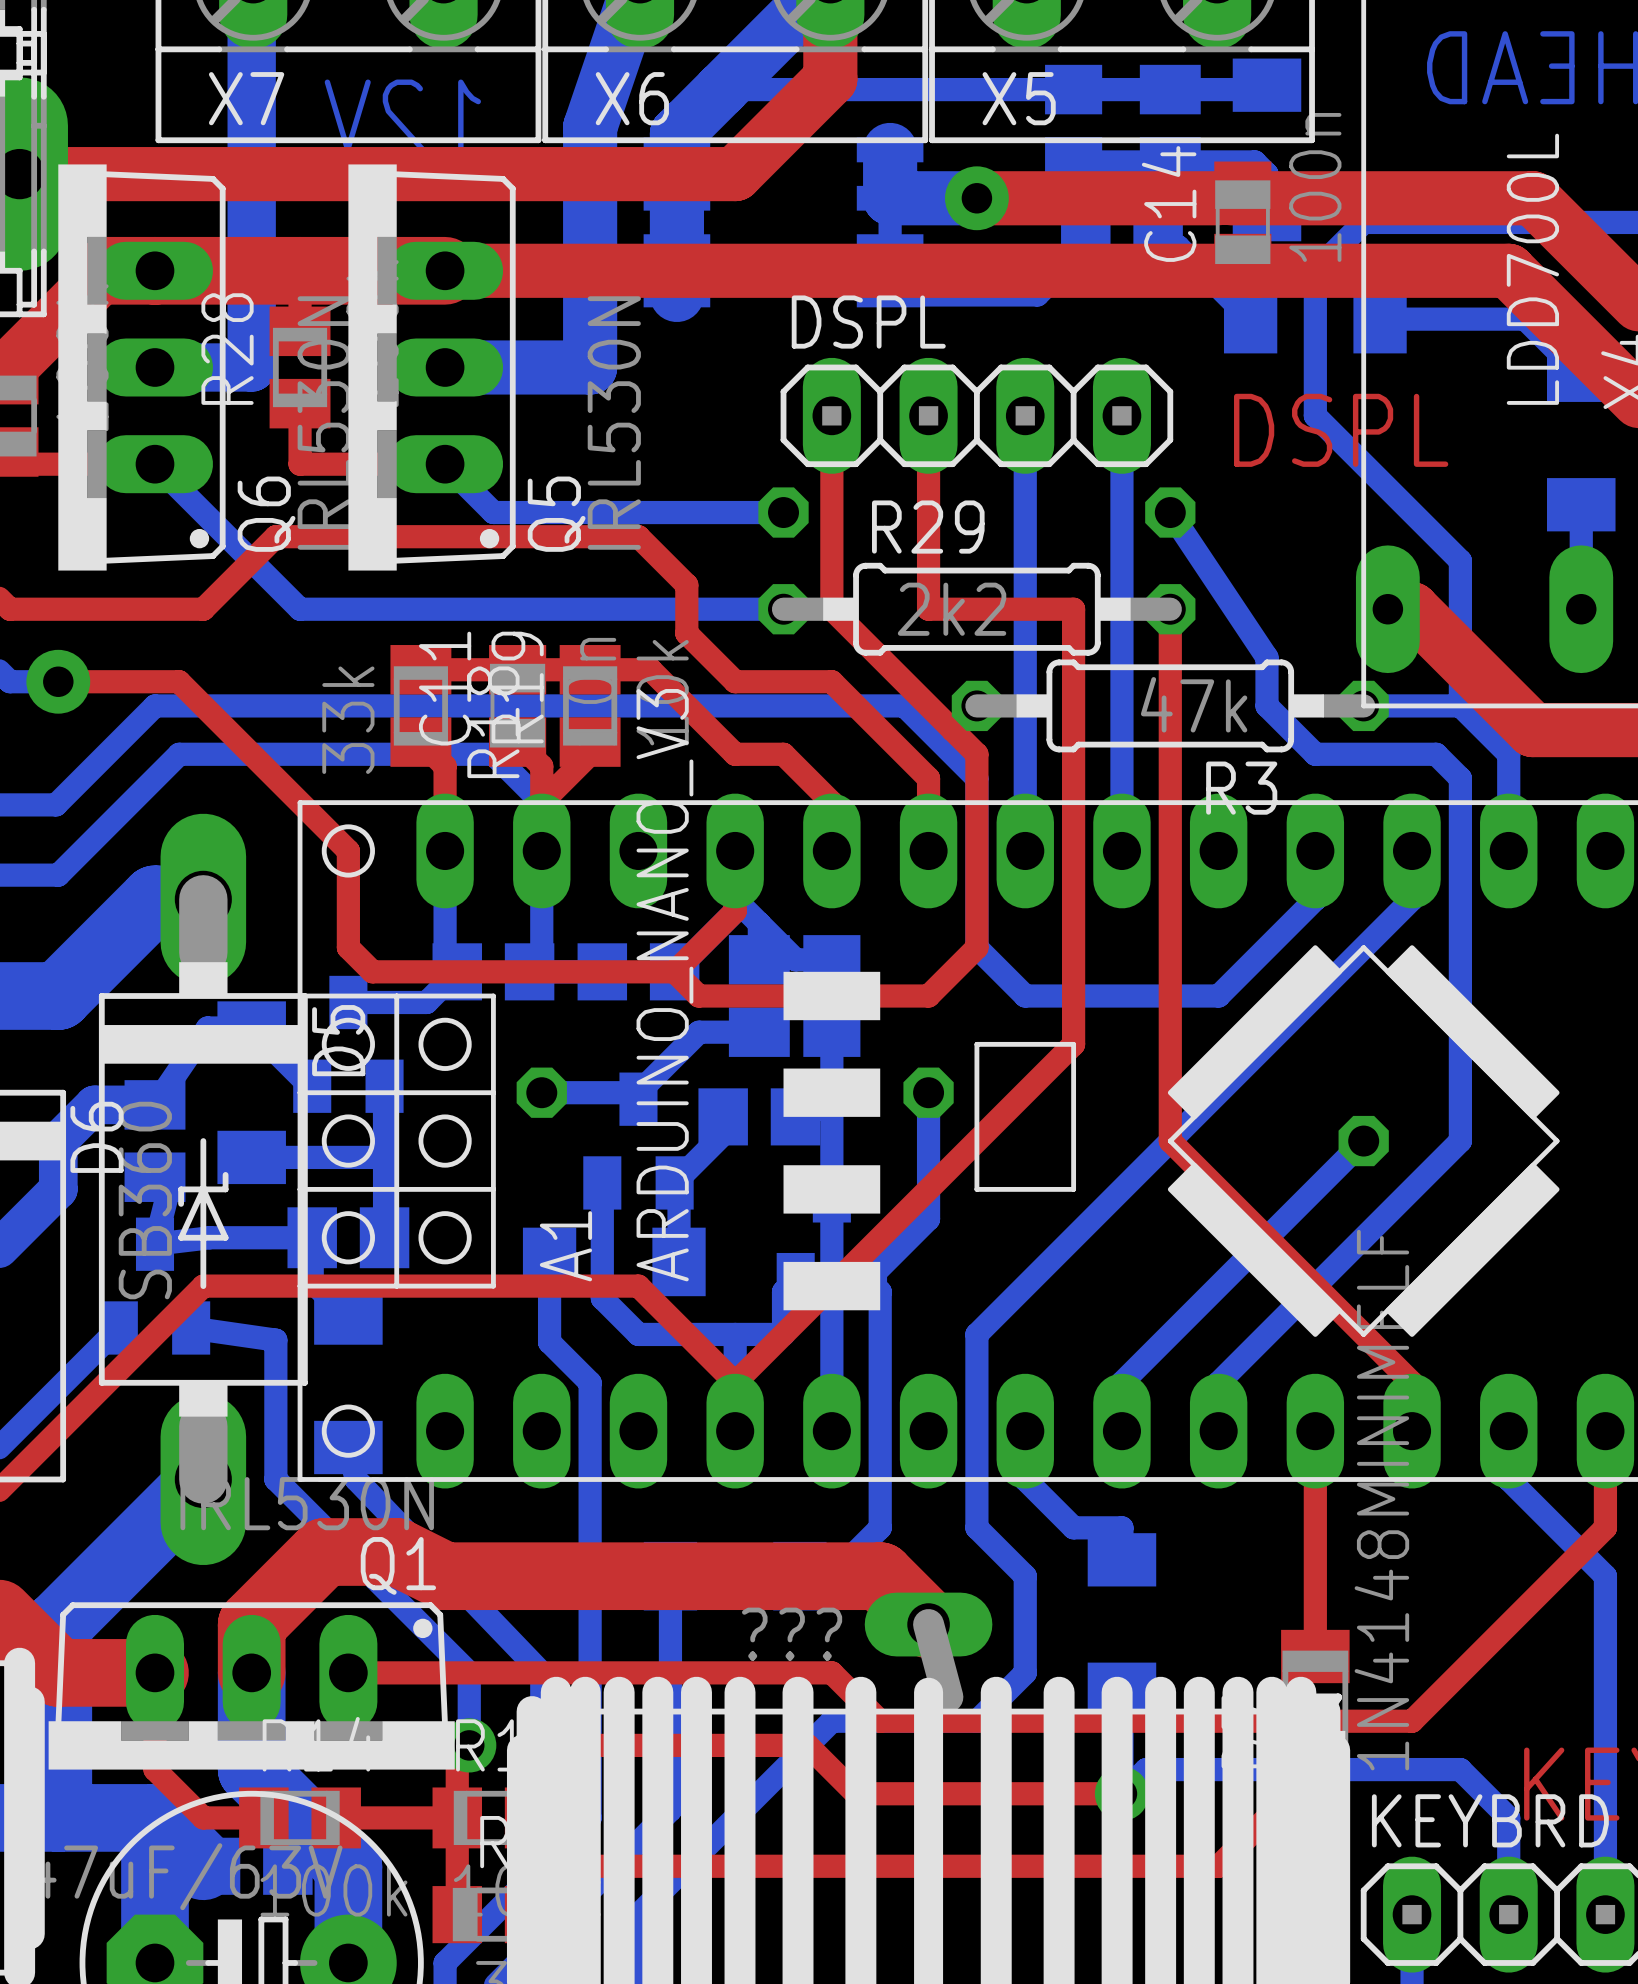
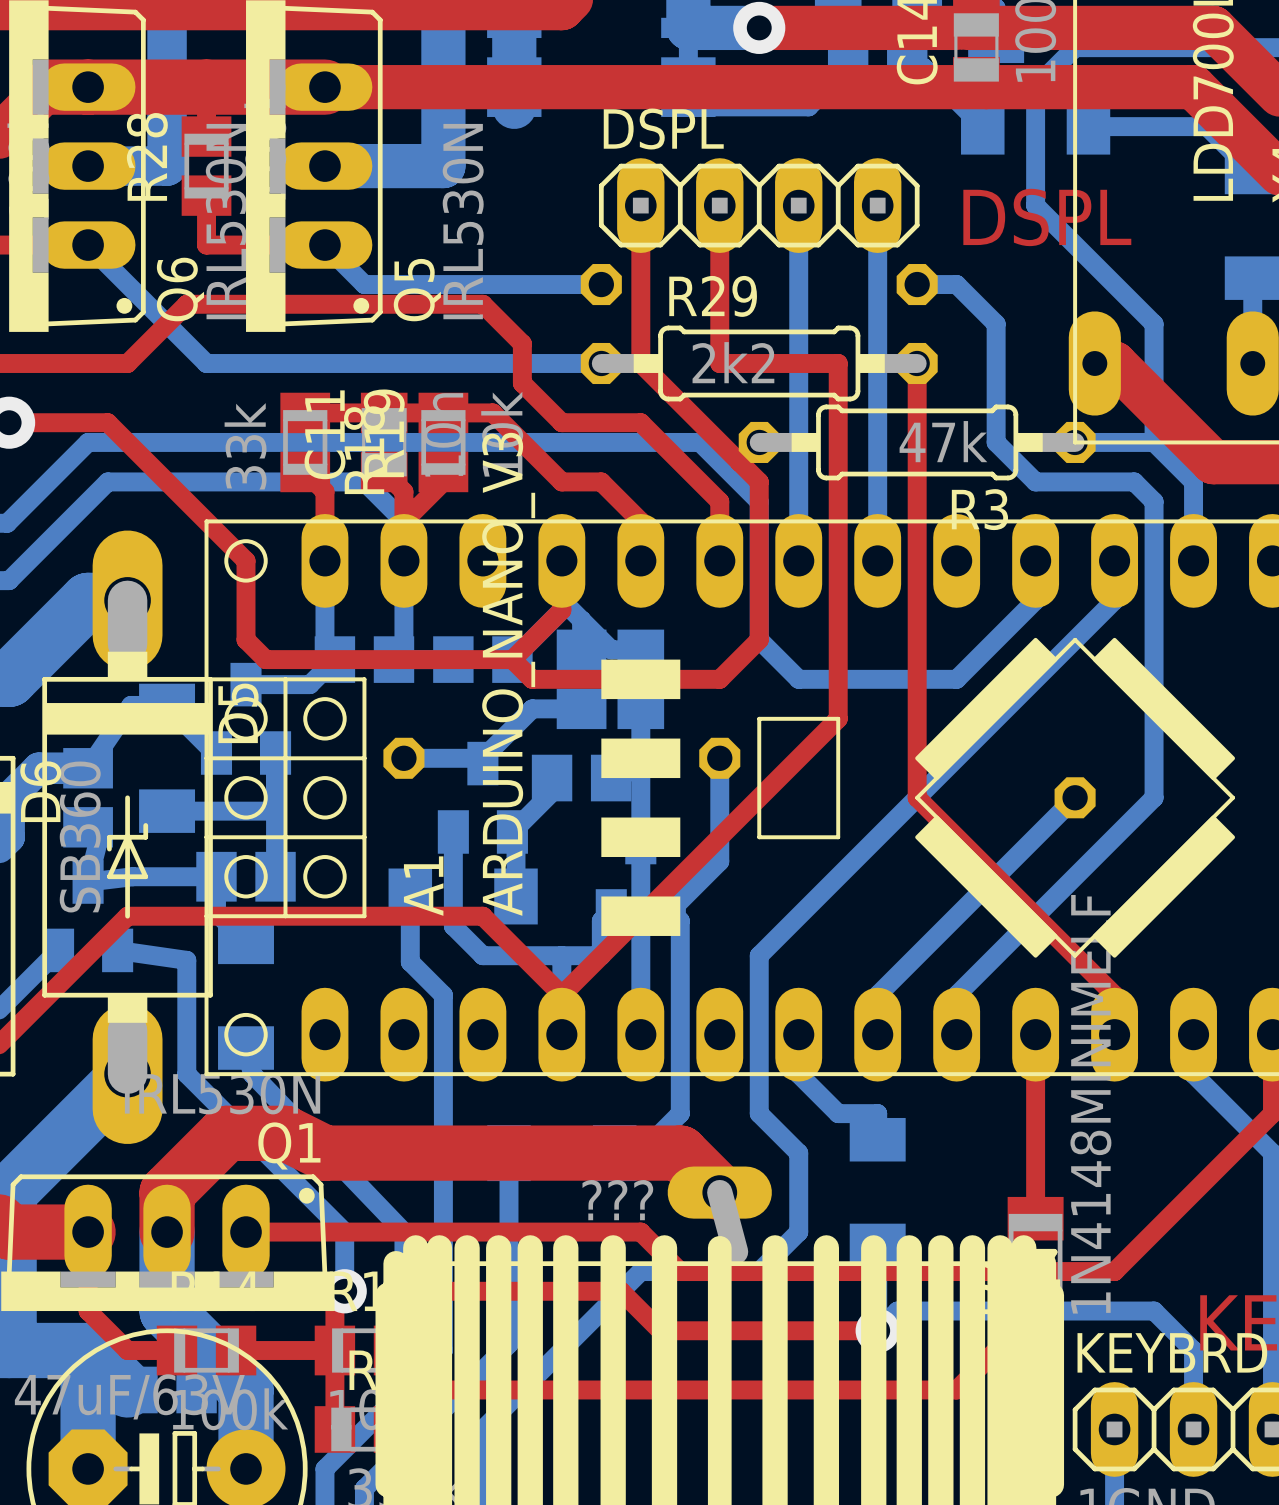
bottom track: (1170, 512) (1266, 657) -> (917, 284) (956, 284) (996, 324) (996, 402)

